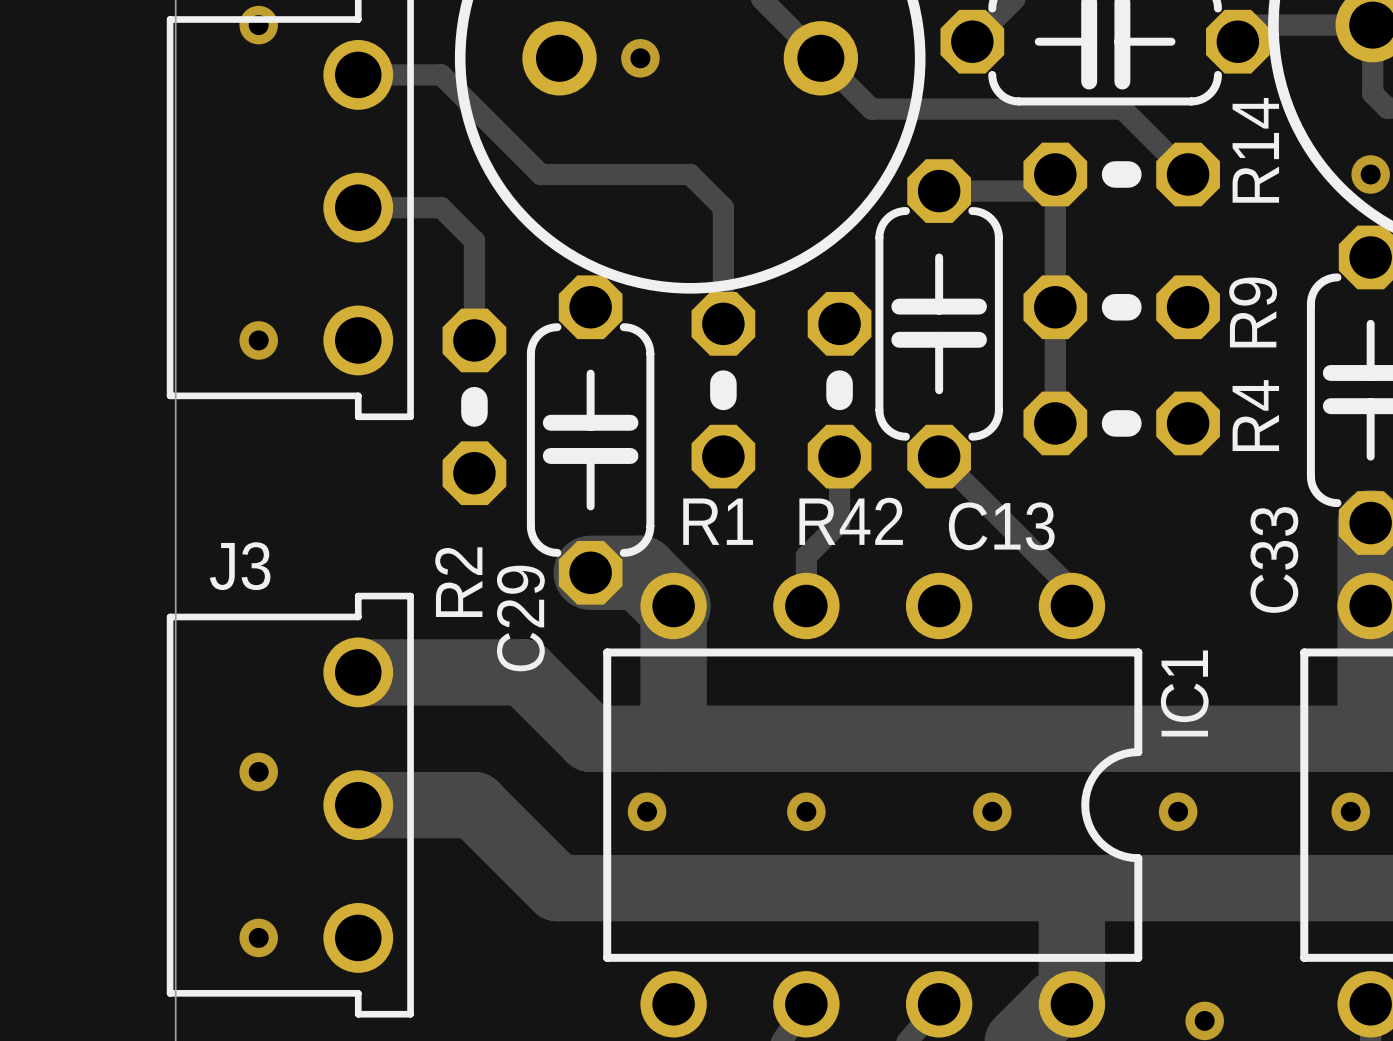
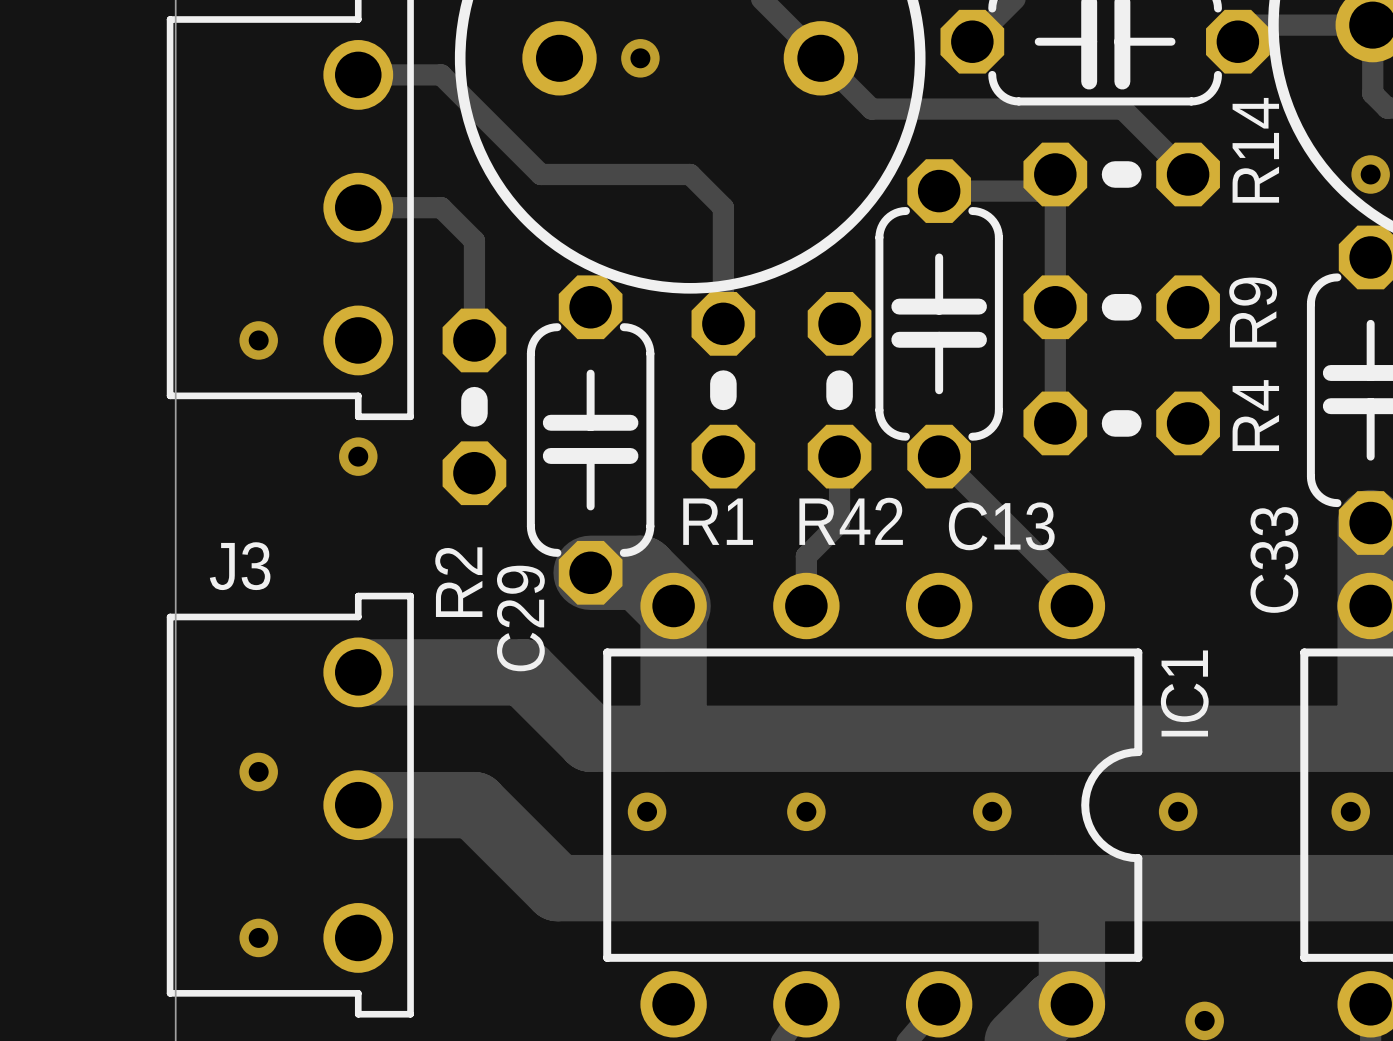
via: (258, 25) -> none
via: none -> (358, 456)

